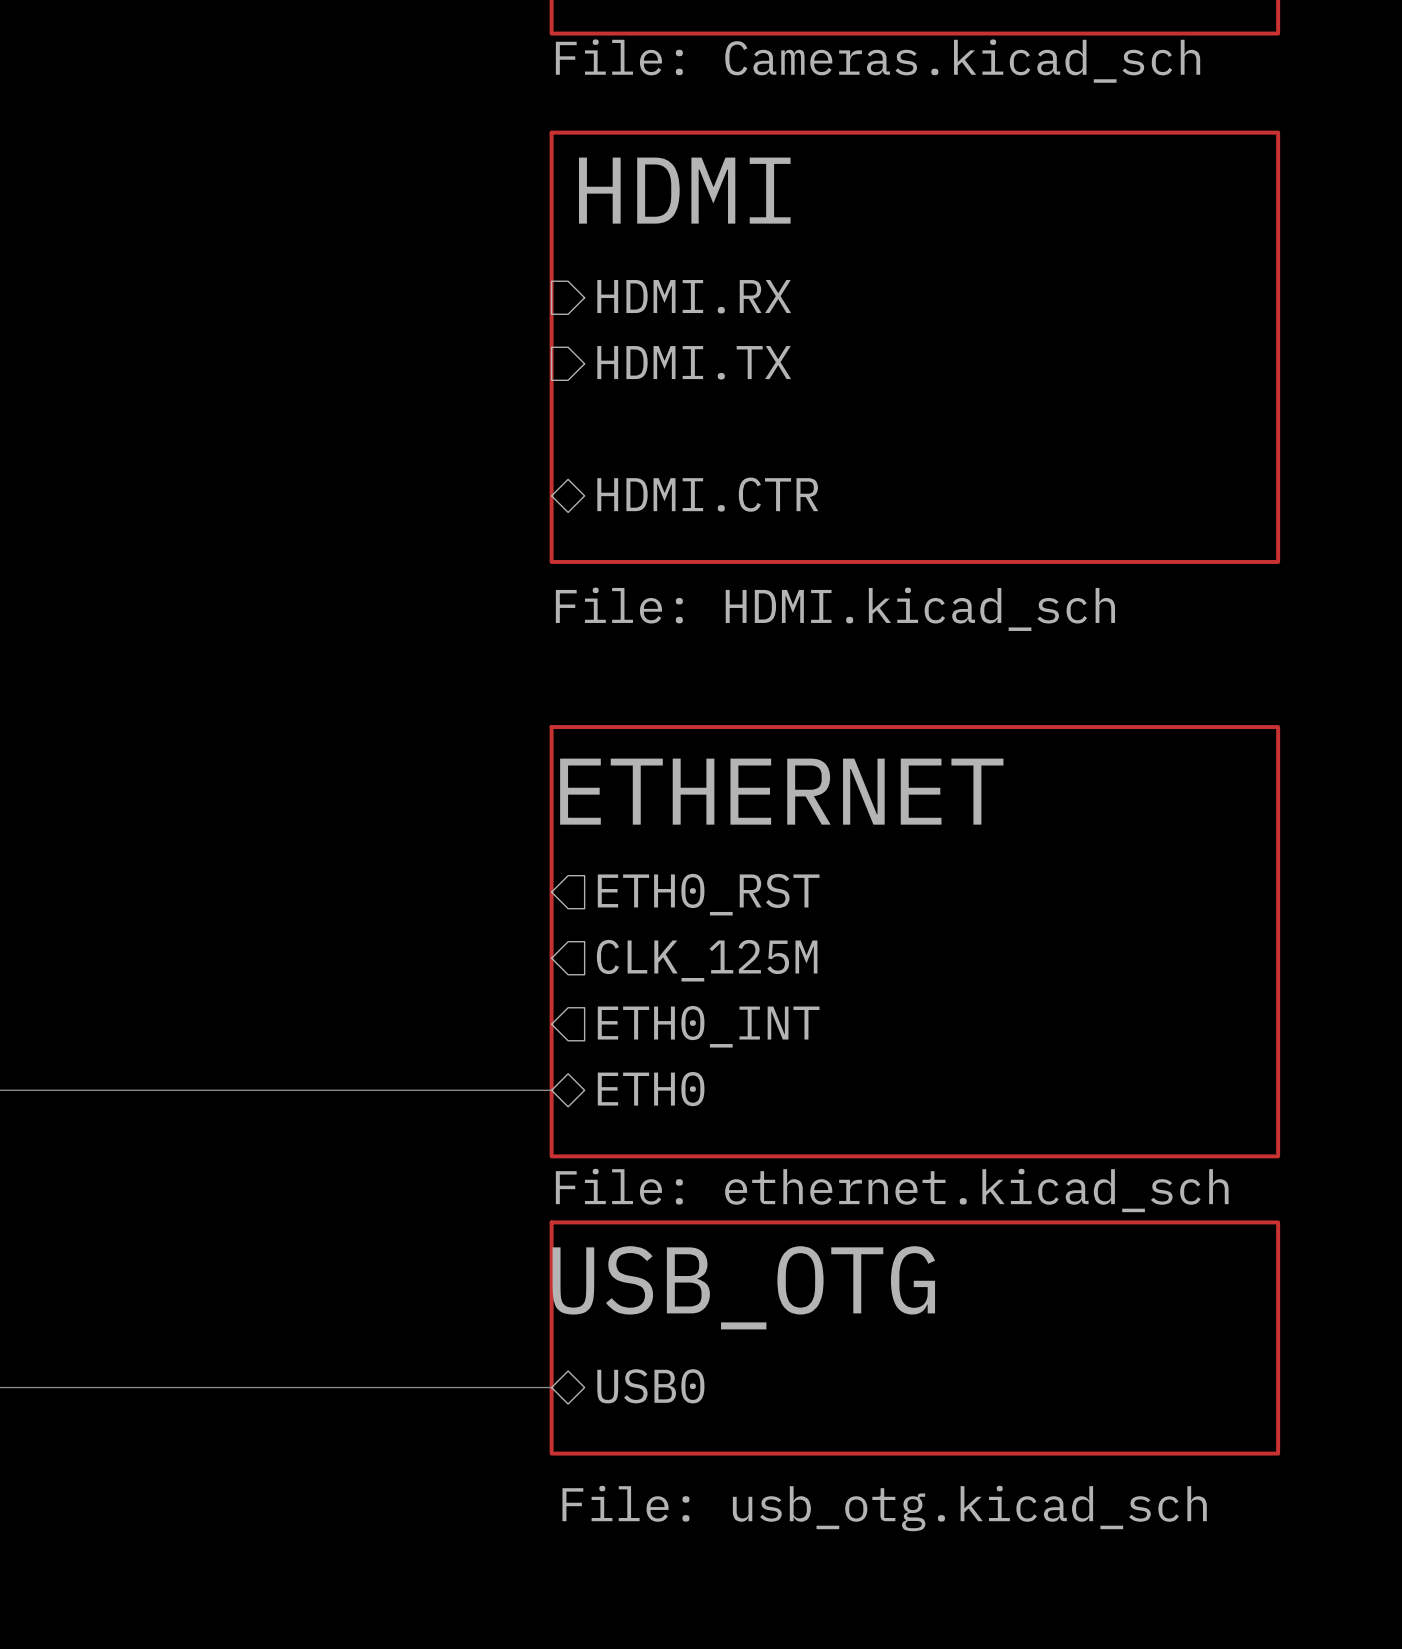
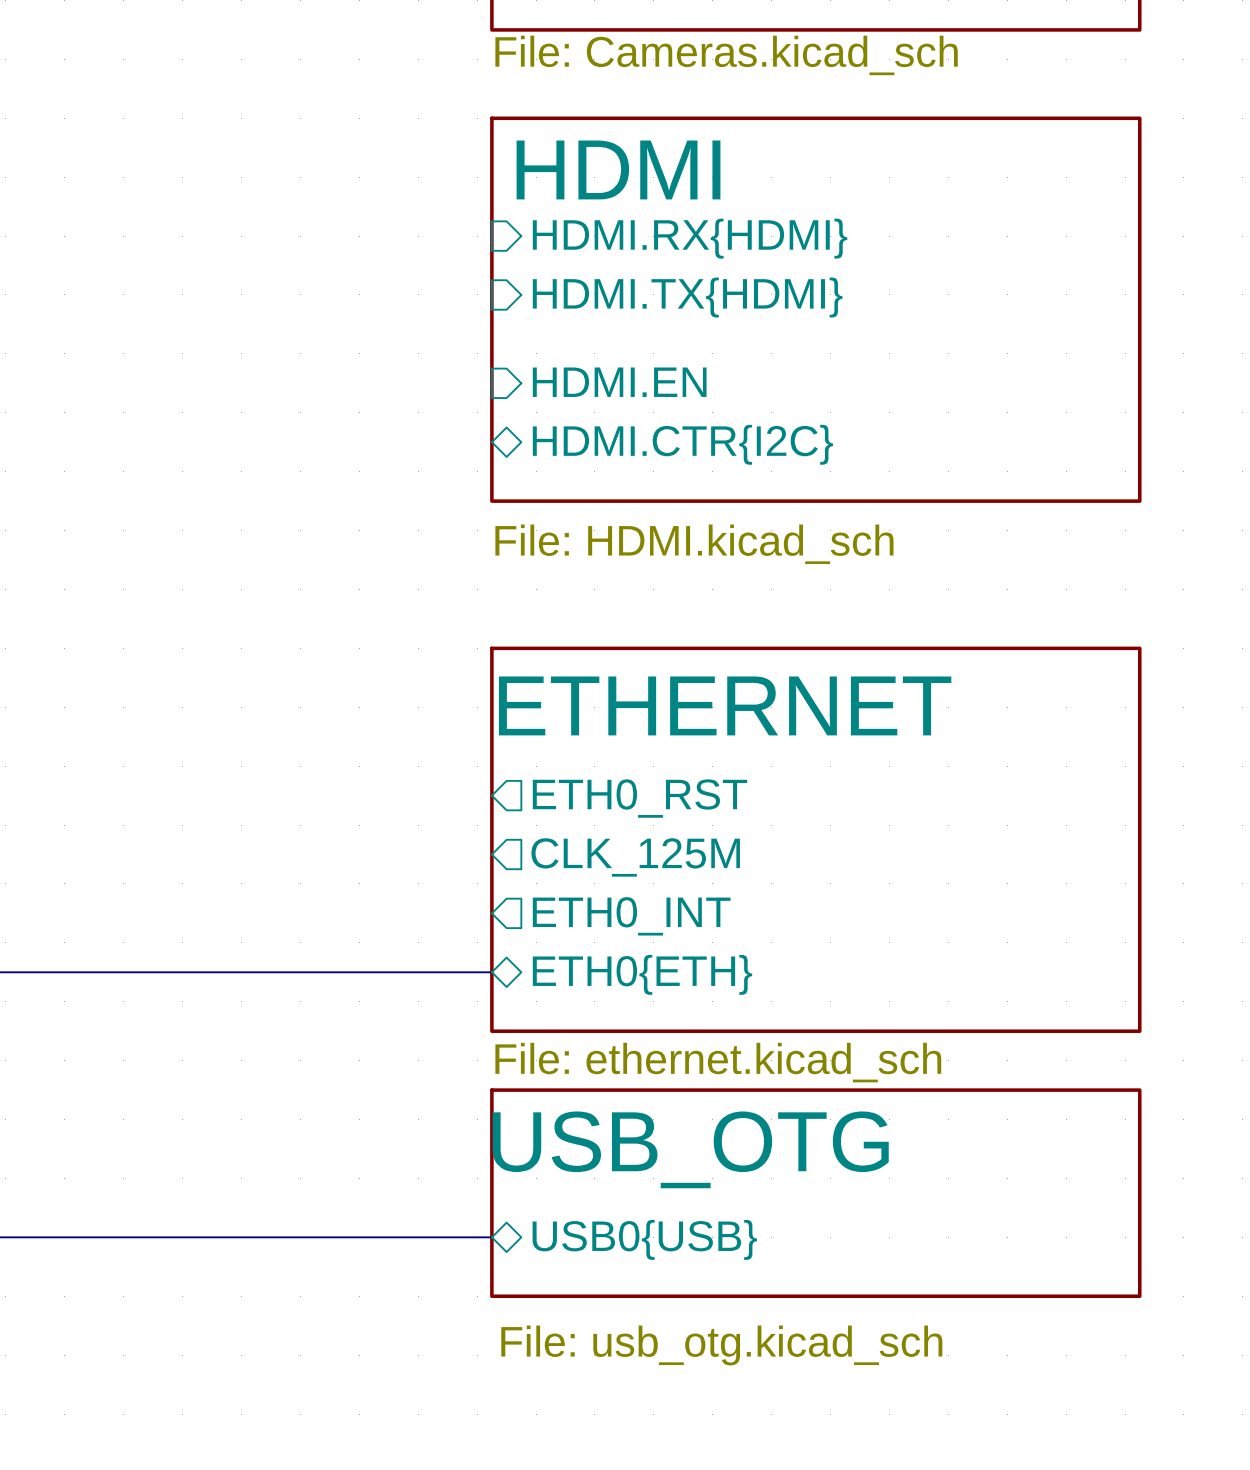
sheet pin: HDMI.RX (694, 296) -> HDMI.RX{HDMI} (690, 238)
sheet pin: none -> HDMI.TX{HDMI} (687, 297)
sheet pin: HDMI.TX (694, 362) -> none
sheet pin: none -> HDMI.EN (619, 382)
sheet pin: HDMI.CTR (707, 494) -> HDMI.CTR{I2C} (682, 444)
sheet pin: ETH0 (651, 1089) -> ETH0{ETH} (642, 974)
sheet pin: USB0 (650, 1386) -> USB0{USB} (644, 1239)

